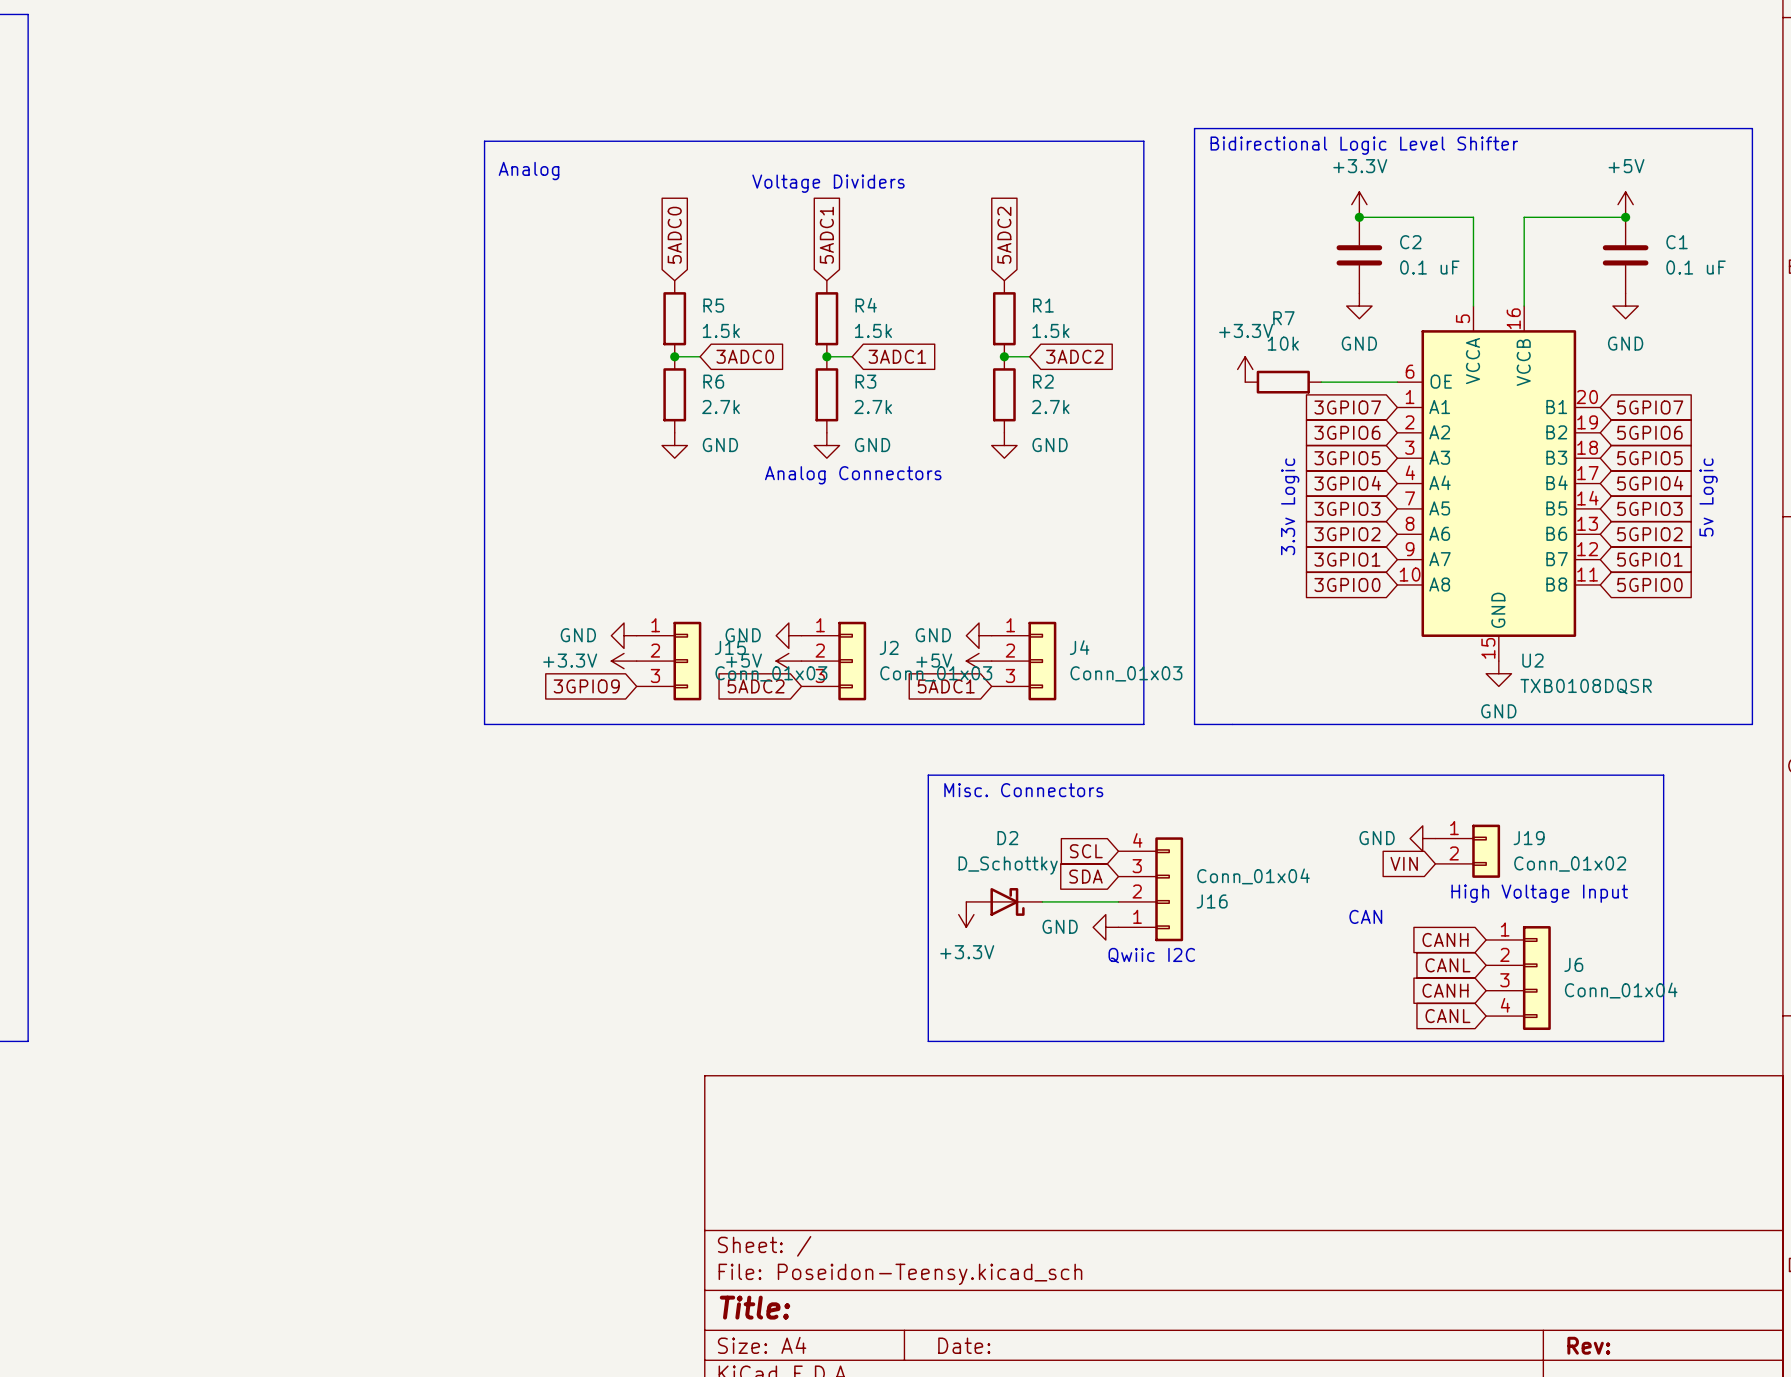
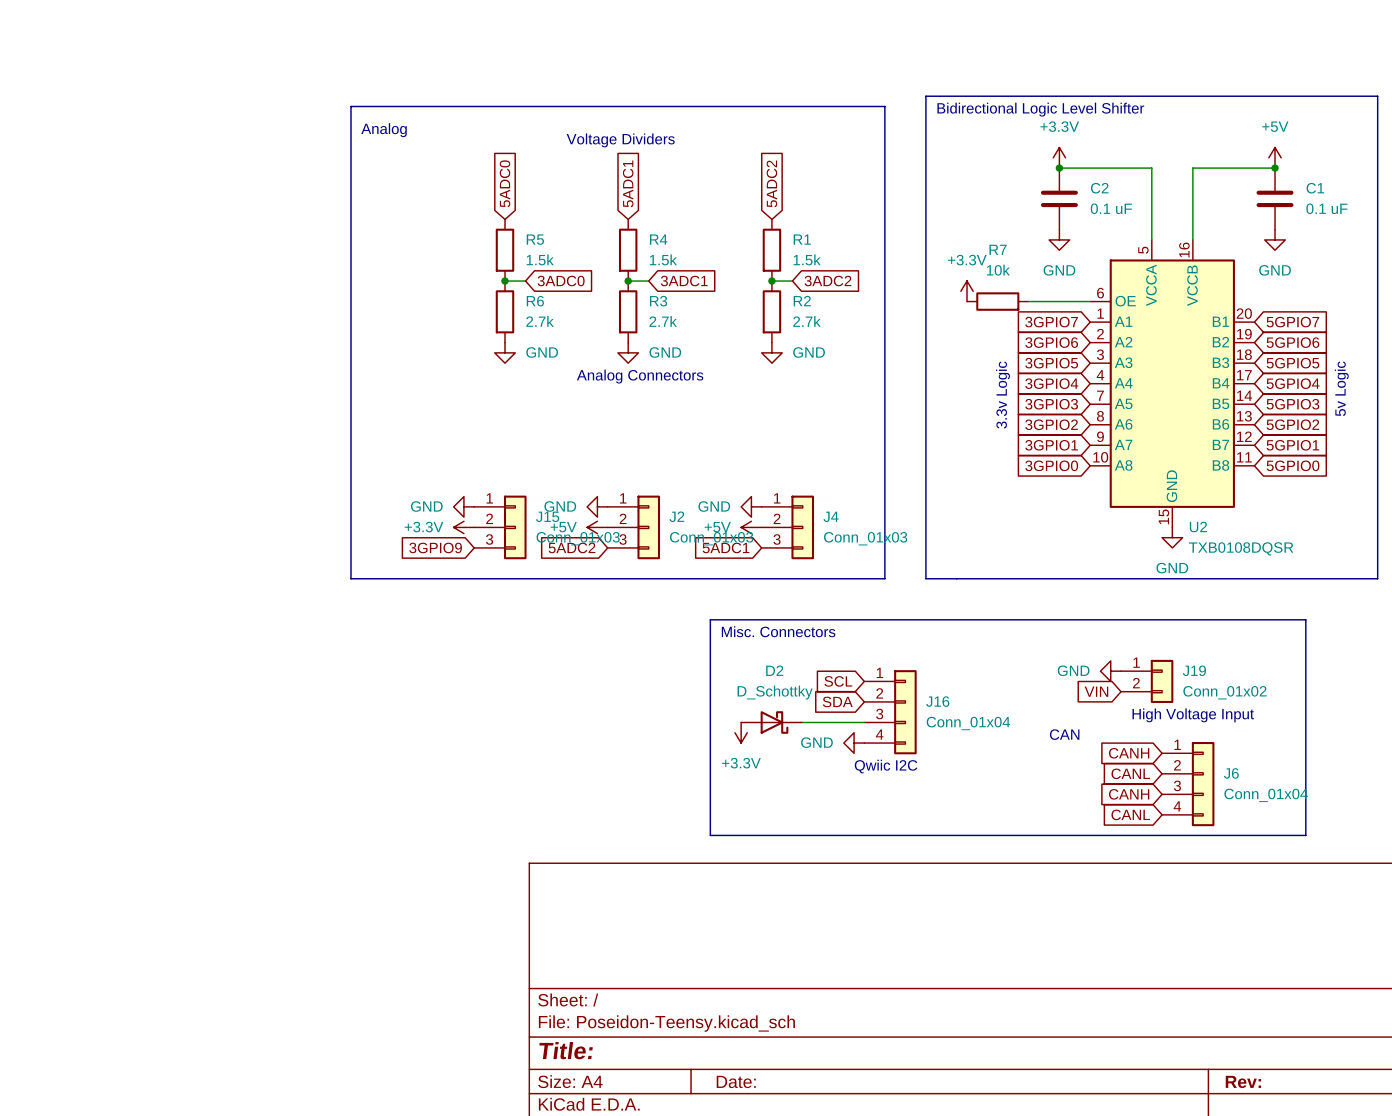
J16 flip: as is (1169, 889) -> up-down (905, 712)

